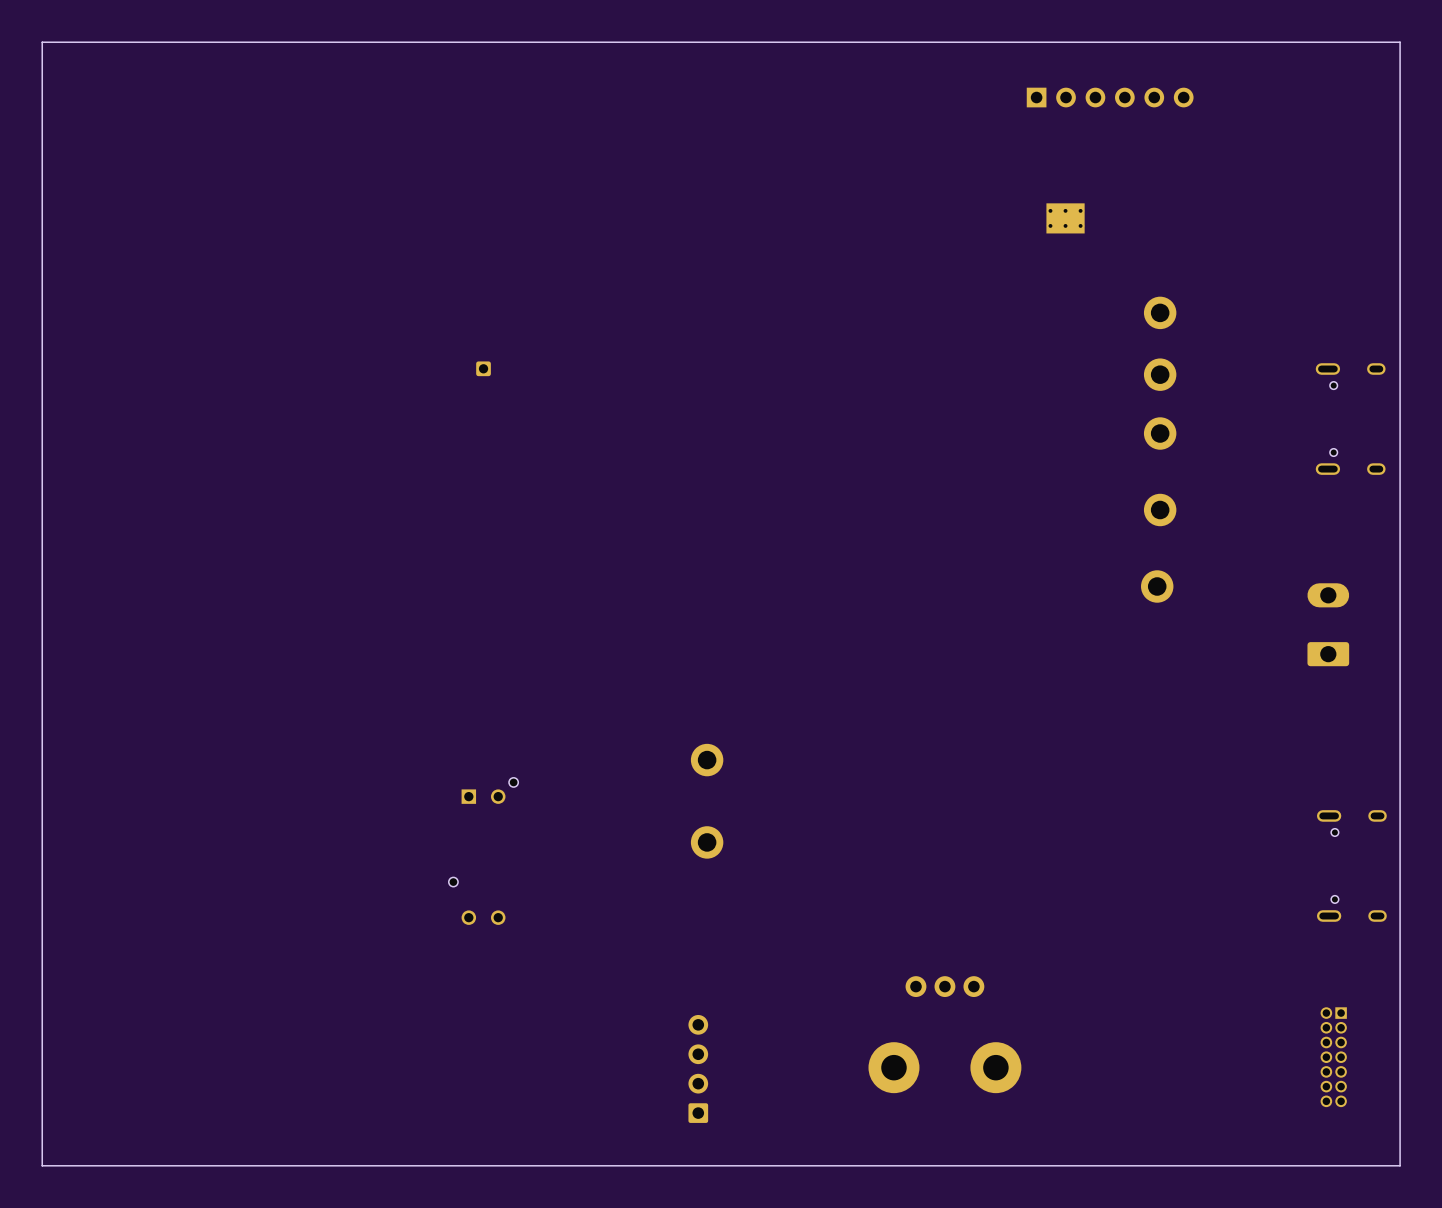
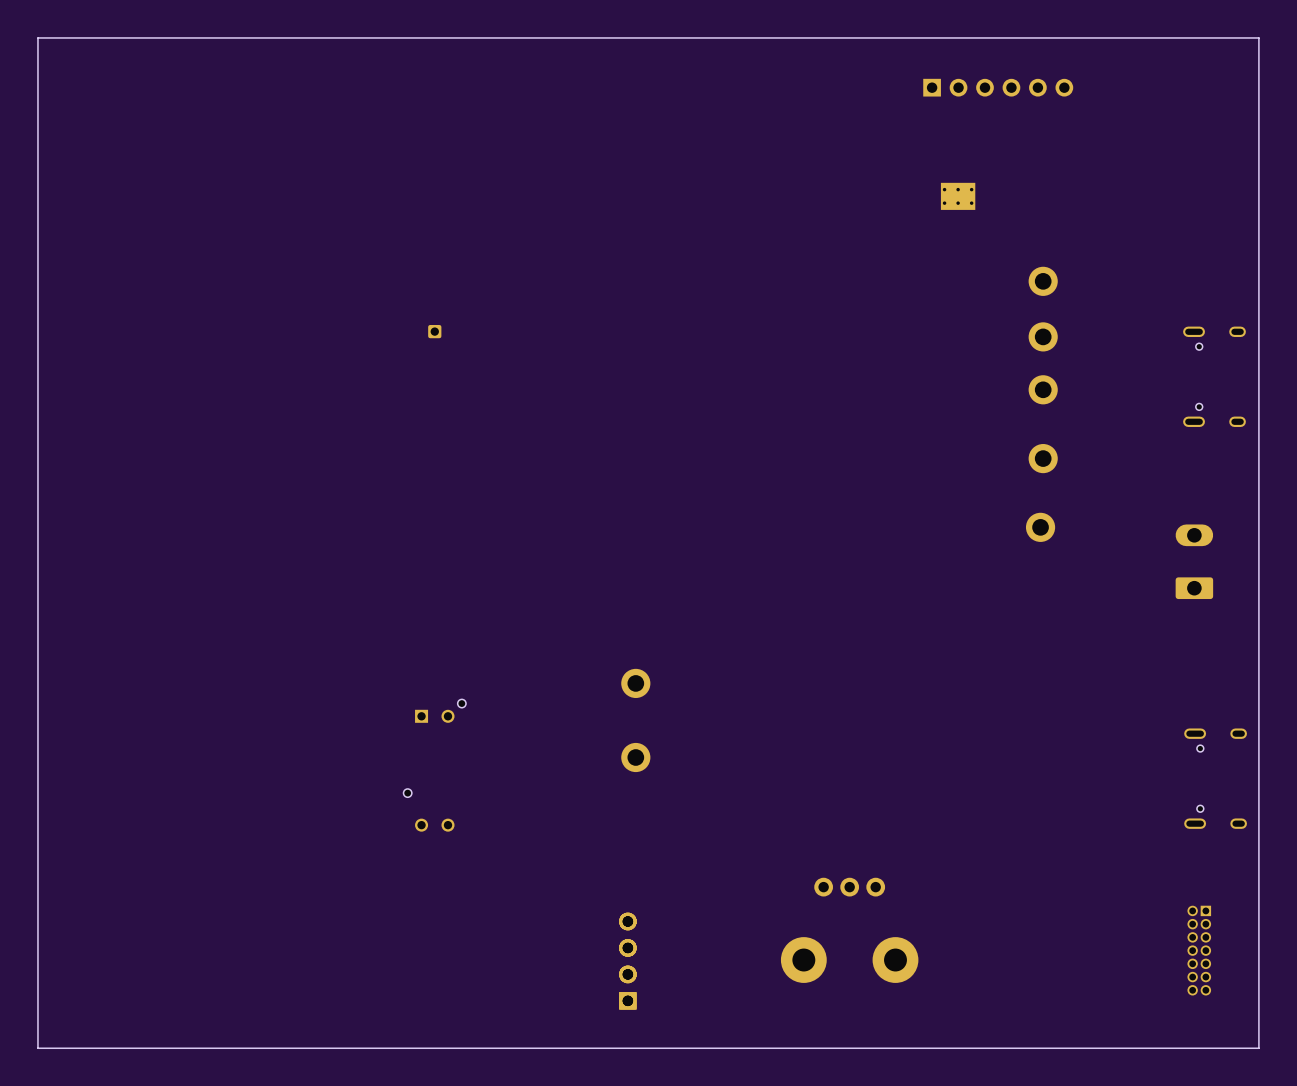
part: none -> (627, 961)

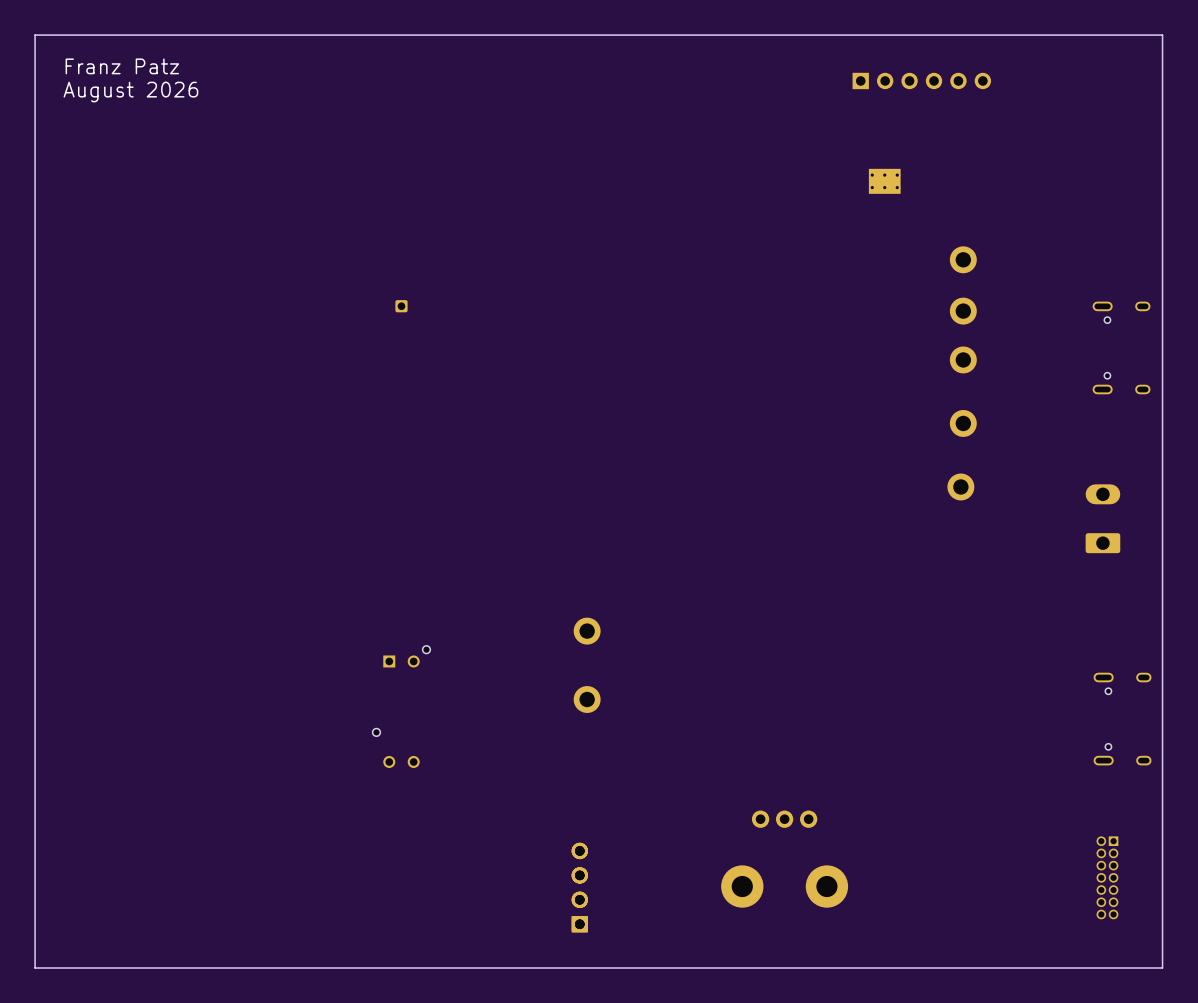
text: none -> Franz Patz (122, 66)
text: none -> August 2026 (130, 92)

